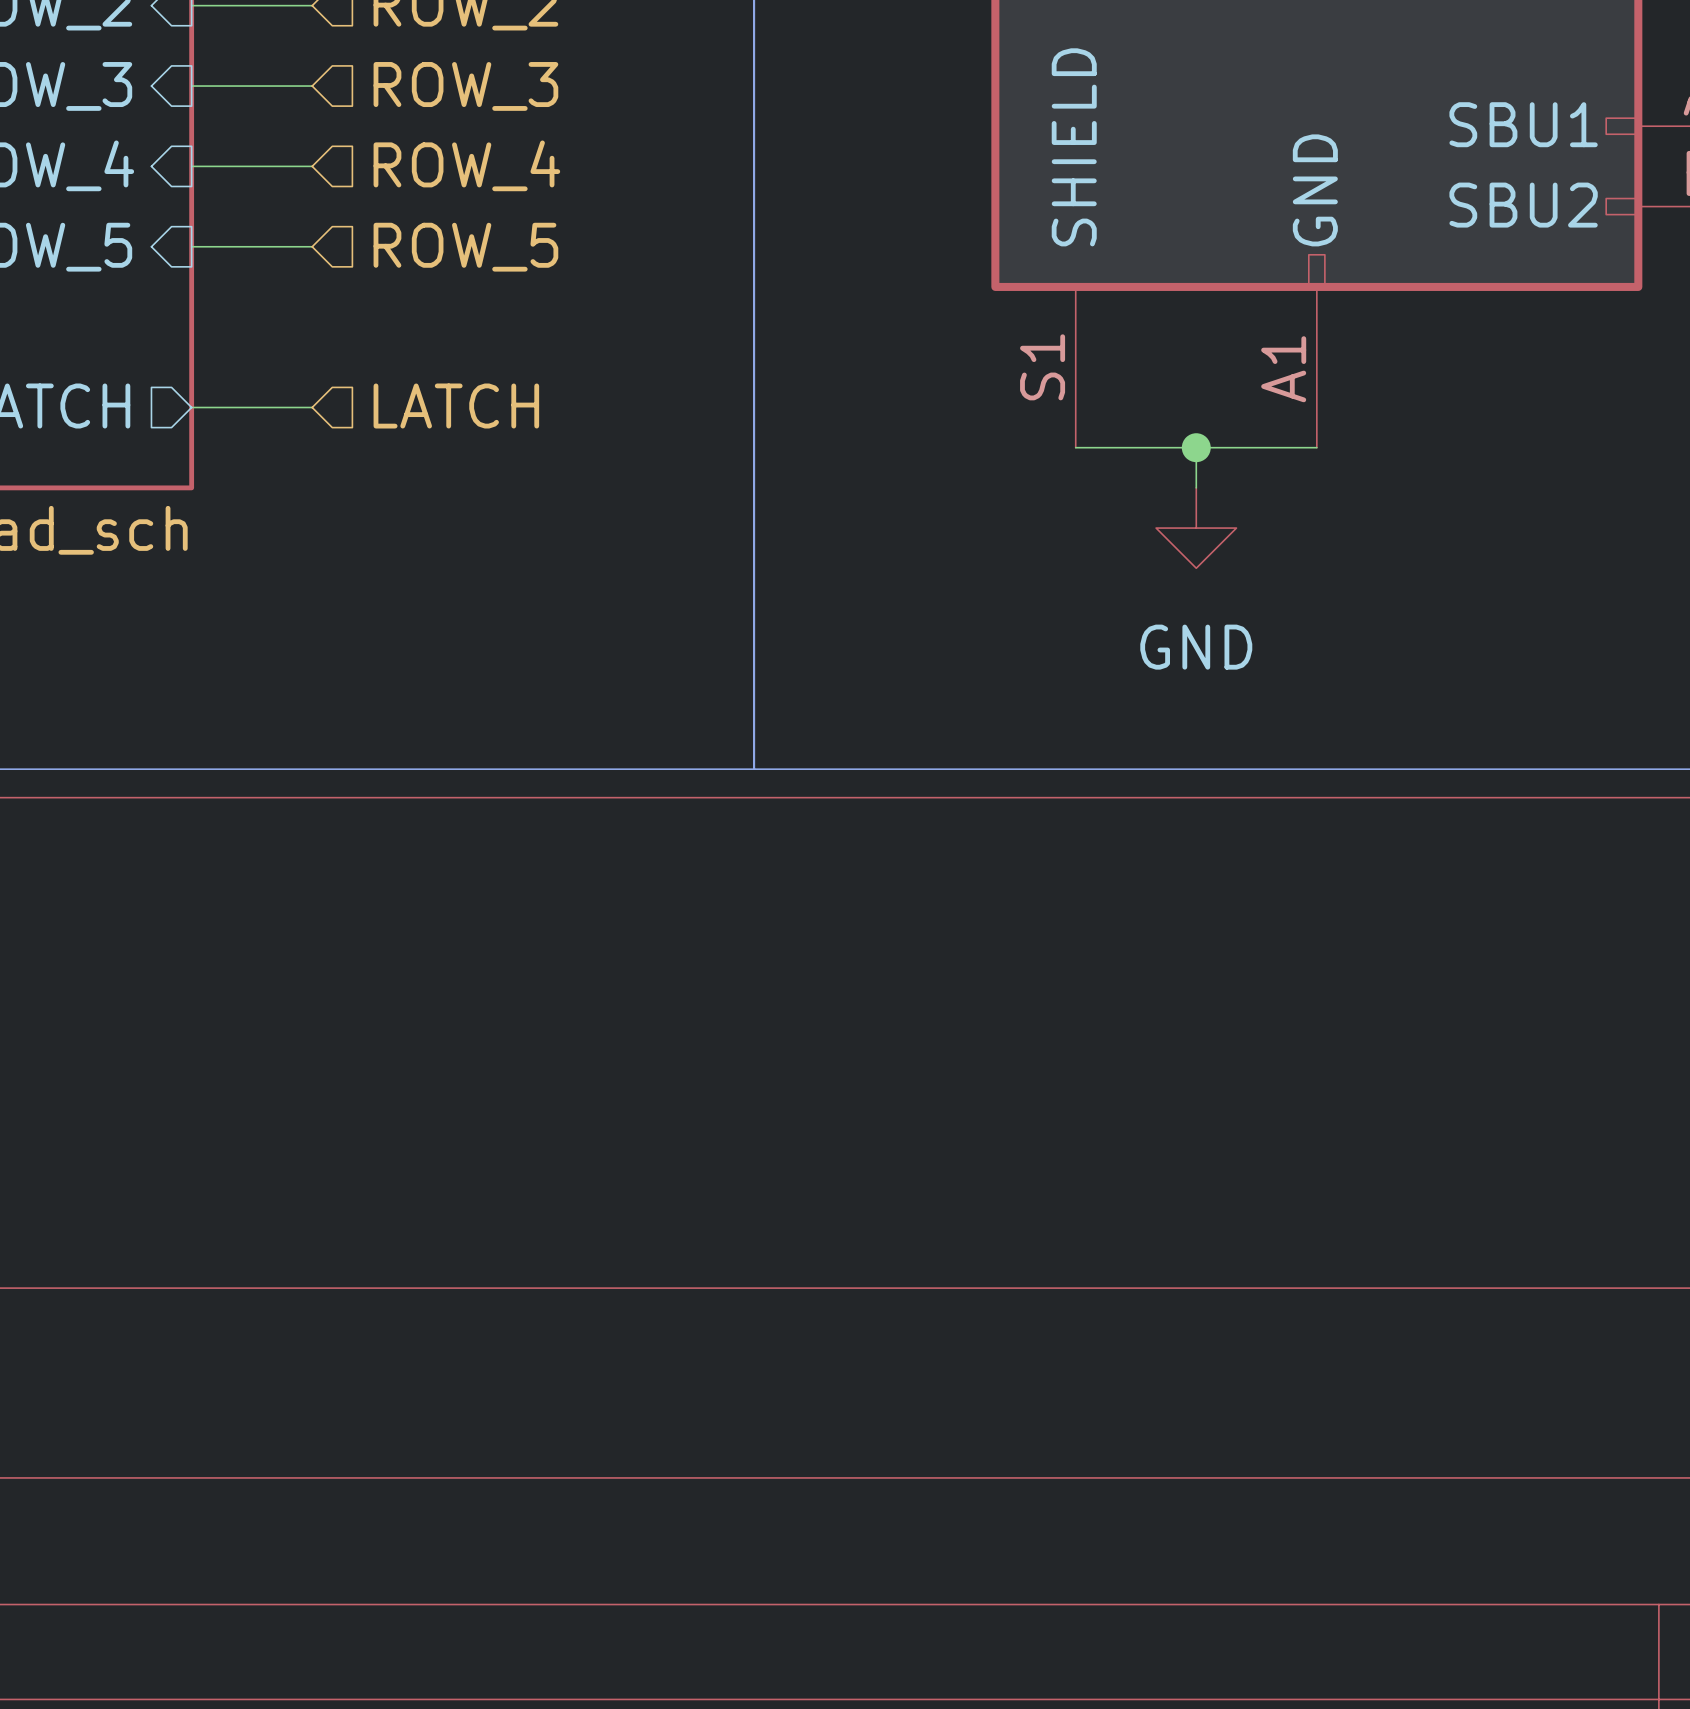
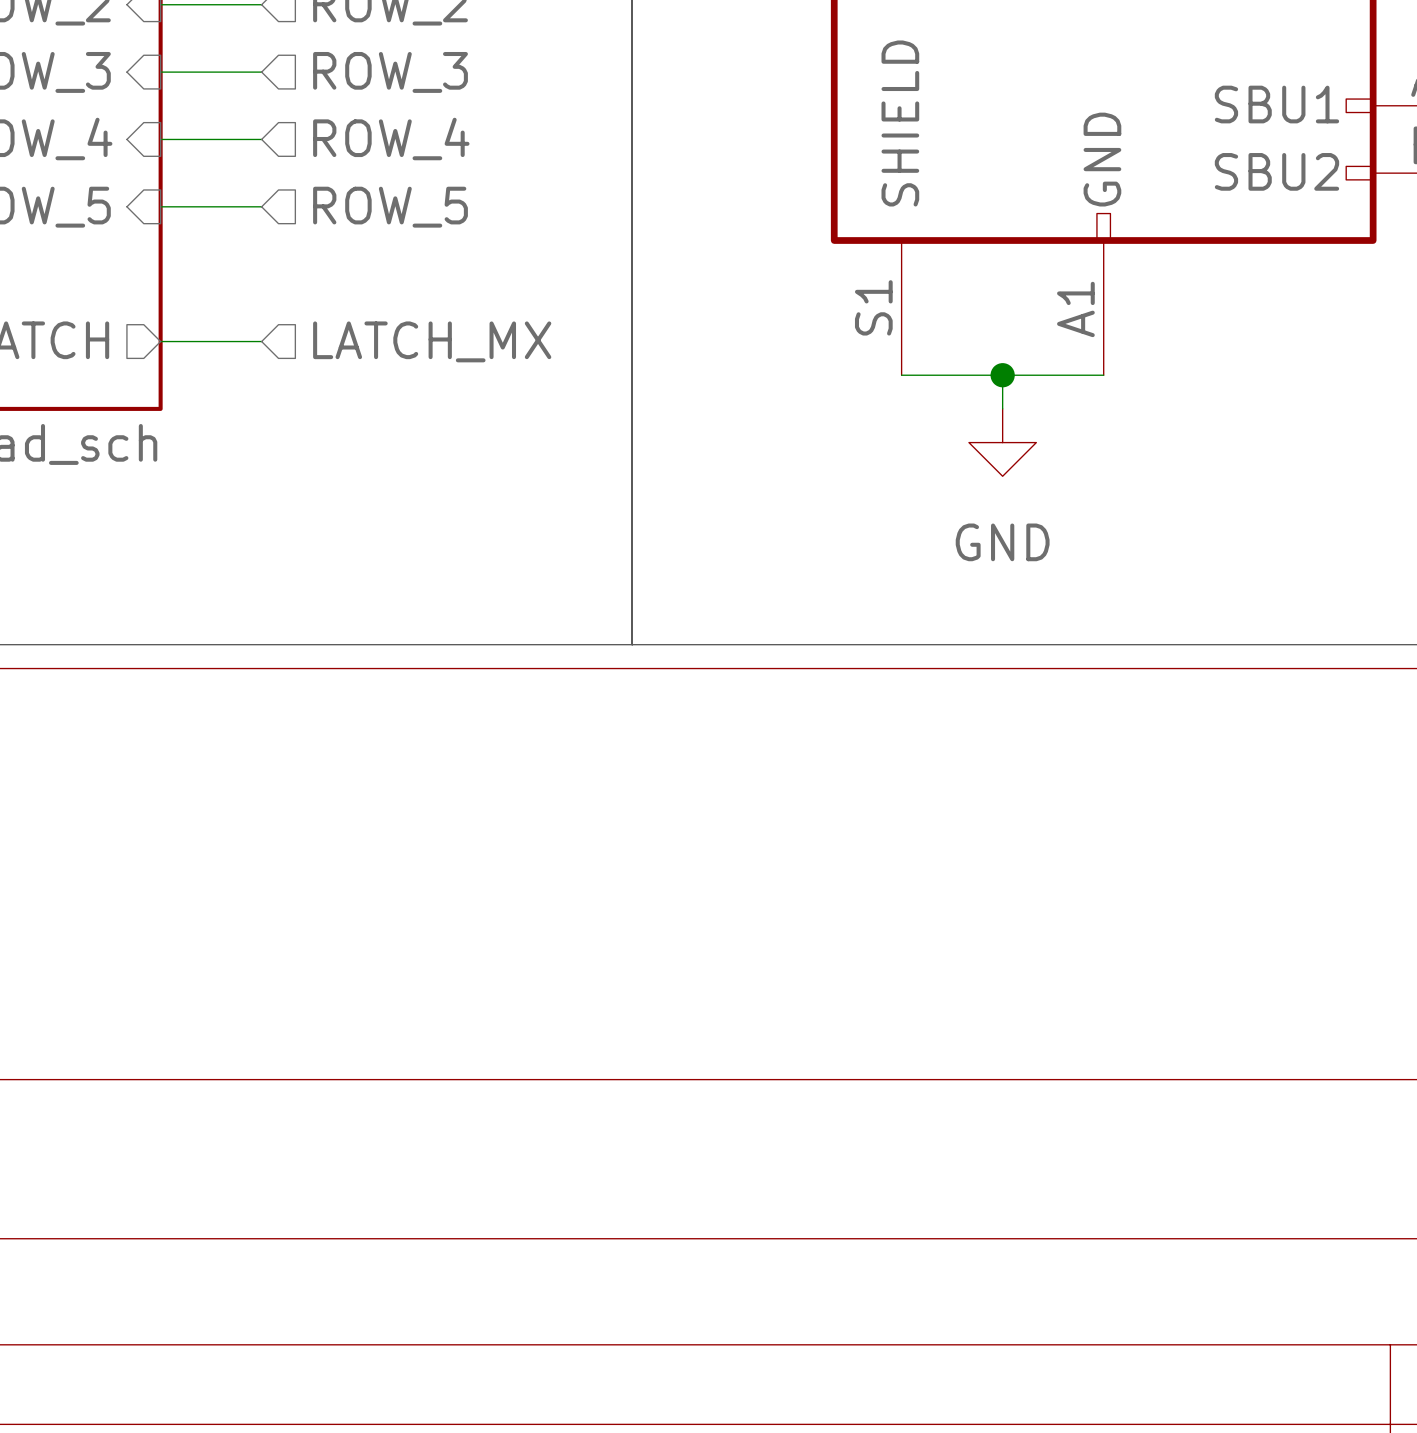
hierarchical label: LATCH (456, 406) -> LATCH_MX (432, 341)

